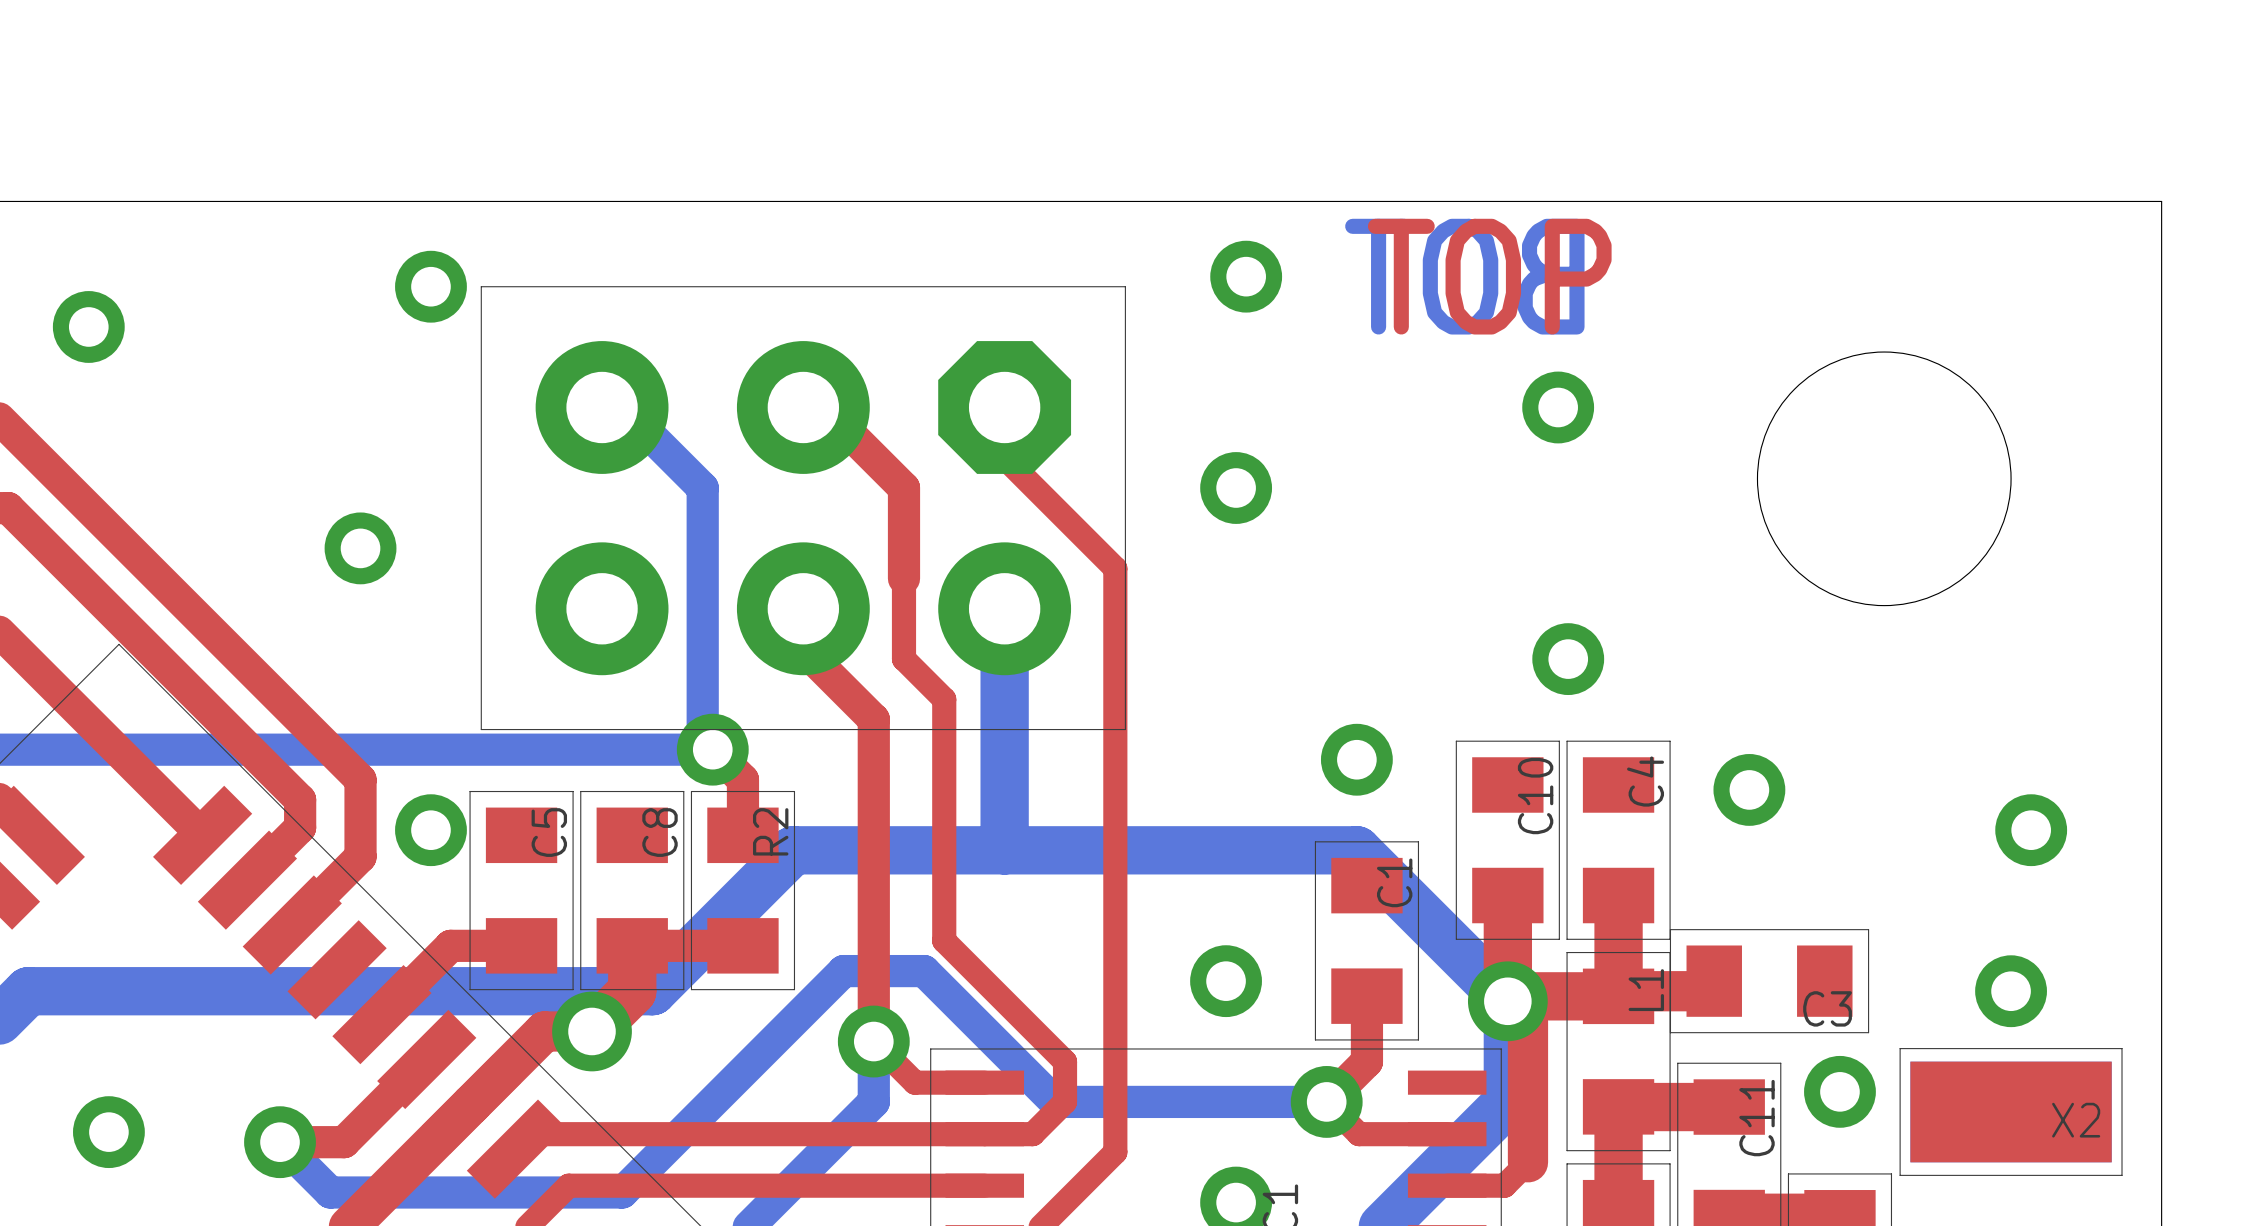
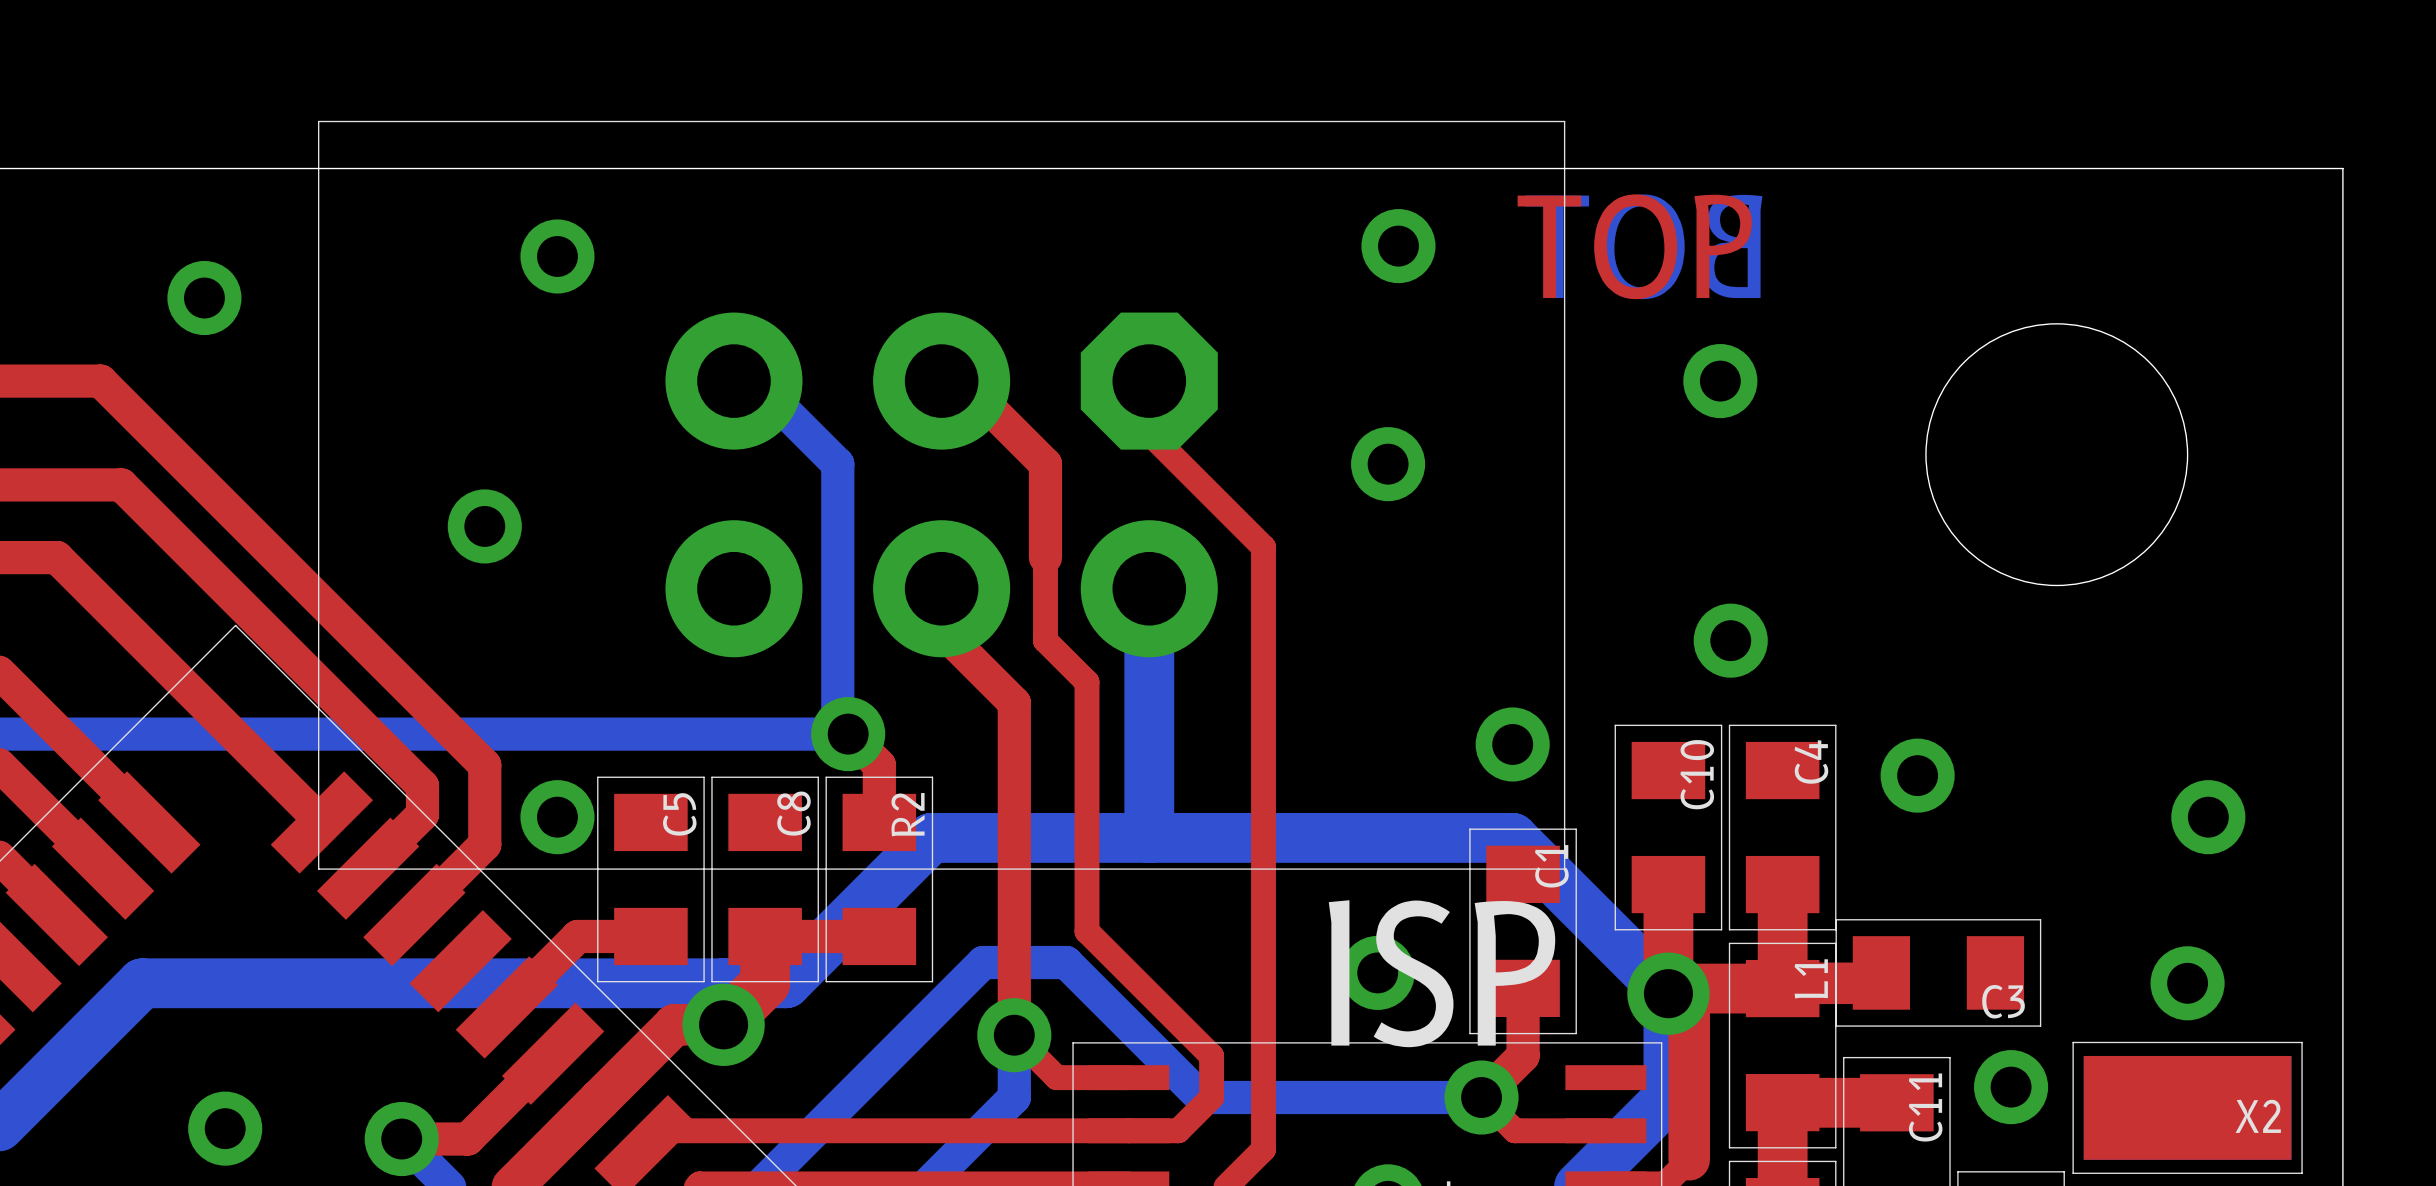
part: (803, 508) -> none
ISP: none -> (941, 495)

